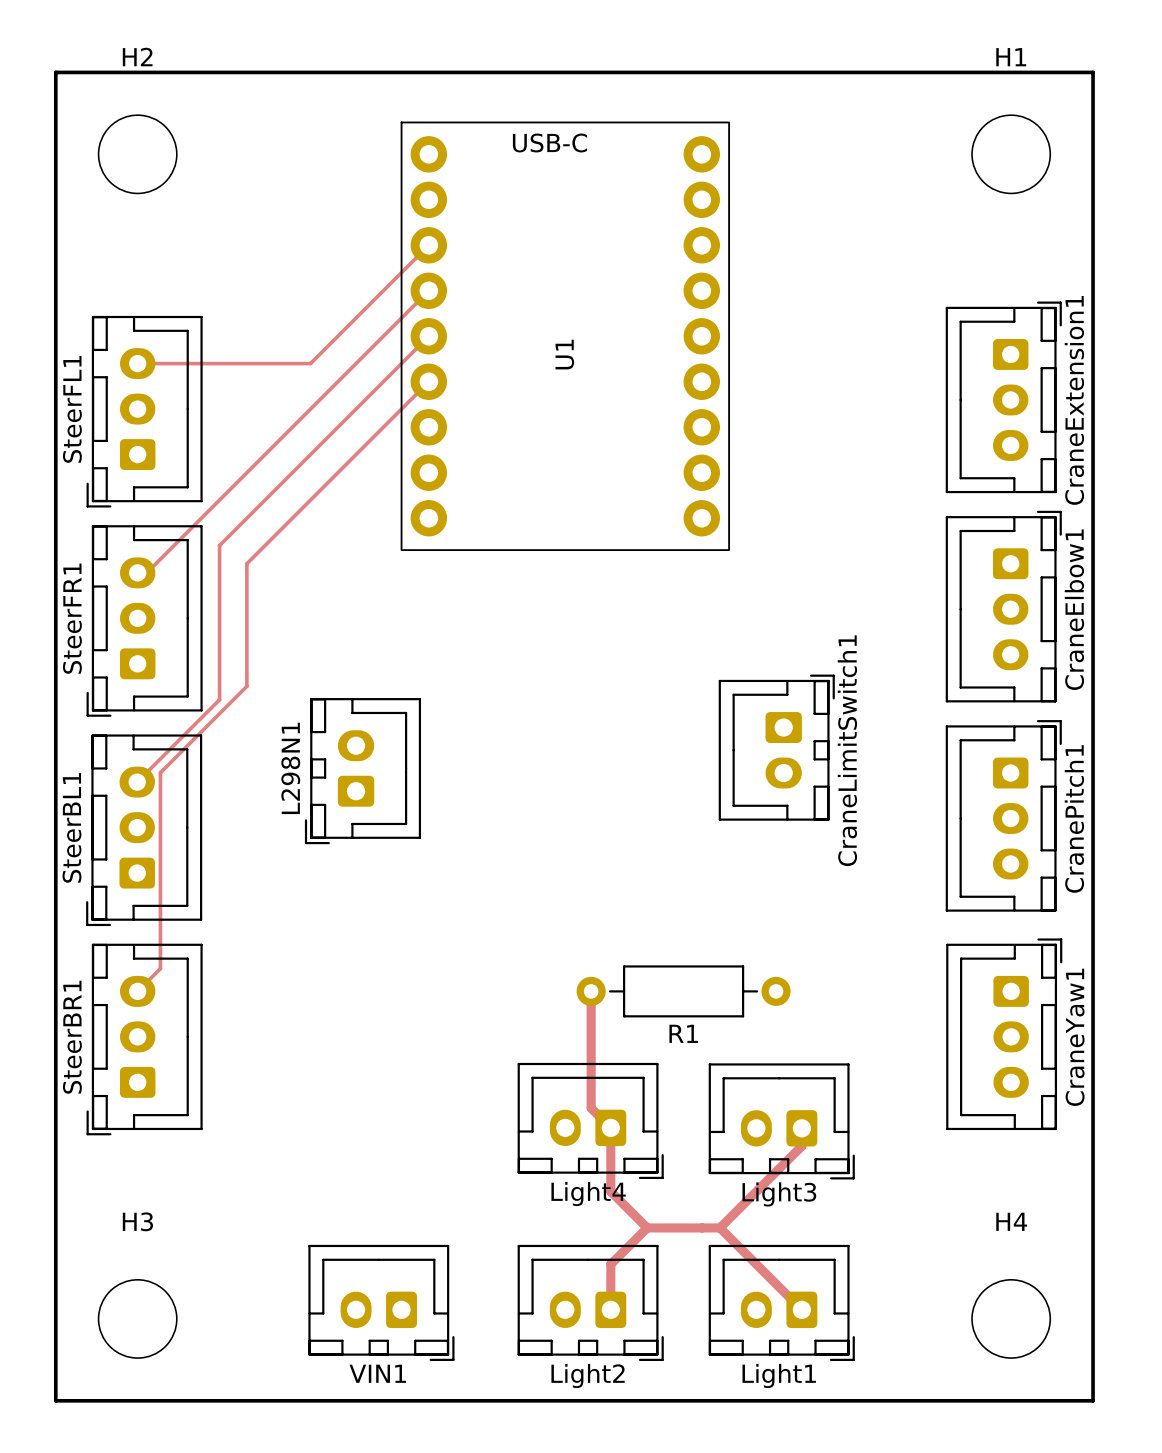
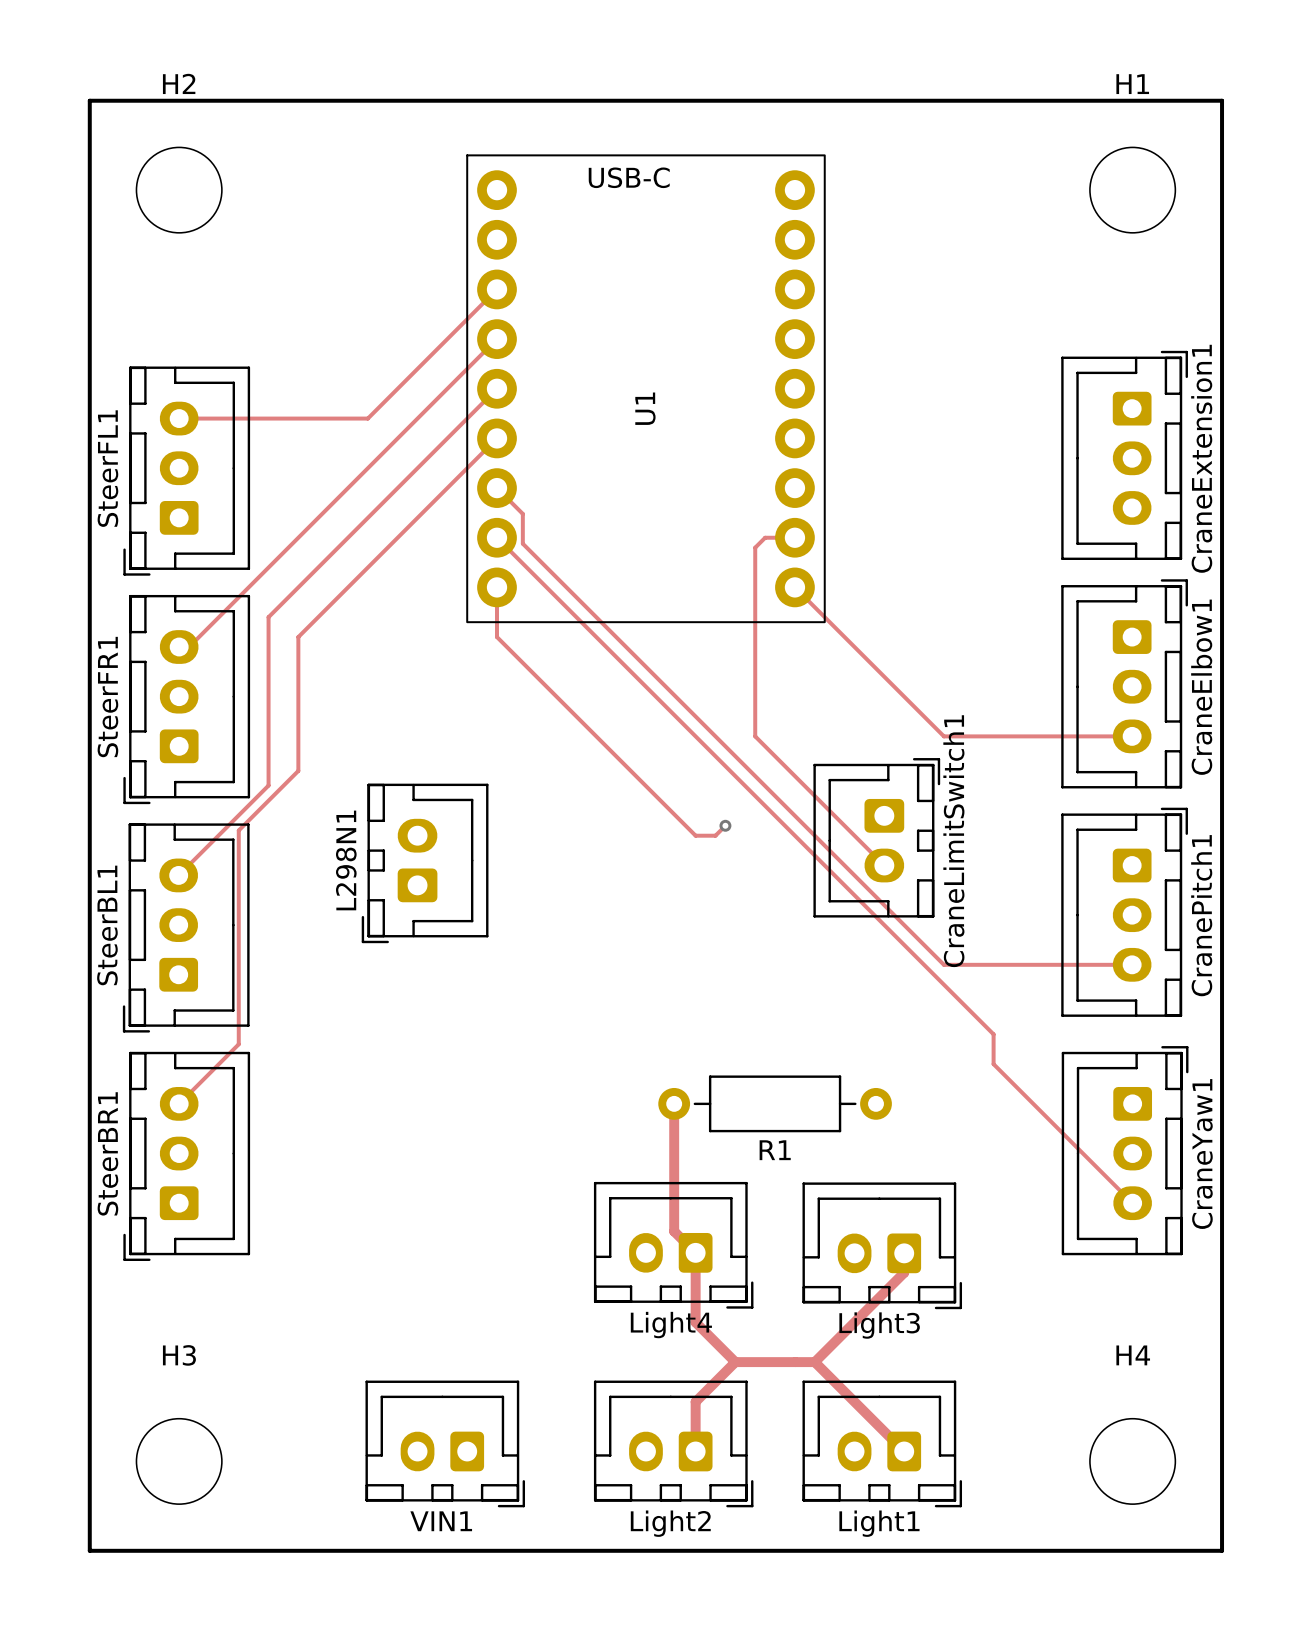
track: none -> (497, 488) (522, 513) (522, 543) (943, 964) (1132, 964)
track: none -> (497, 537) (993, 1034) (993, 1064) (1132, 1203)
track: none -> (794, 537) (765, 537) (755, 547) (755, 736) (884, 865)
track: none -> (497, 587) (497, 637) (695, 835) (715, 835) (725, 825)
track: none -> (794, 587) (943, 736) (1132, 736)
via: none -> (725, 825)
track: (192, 740) (160, 772) (160, 968) -> (238, 830) (238, 1044) (204, 1079)

